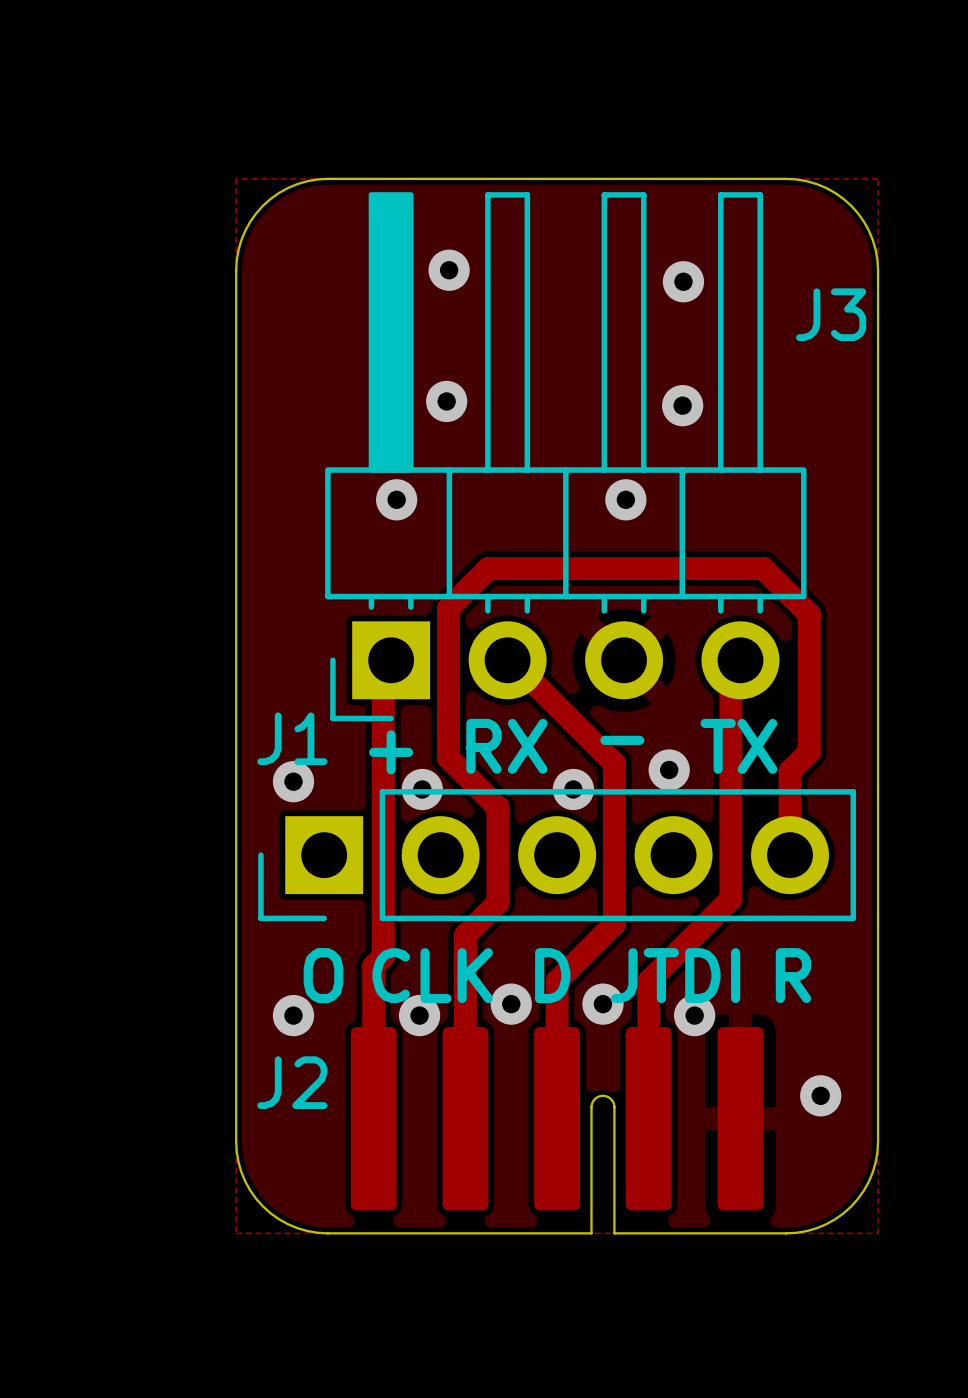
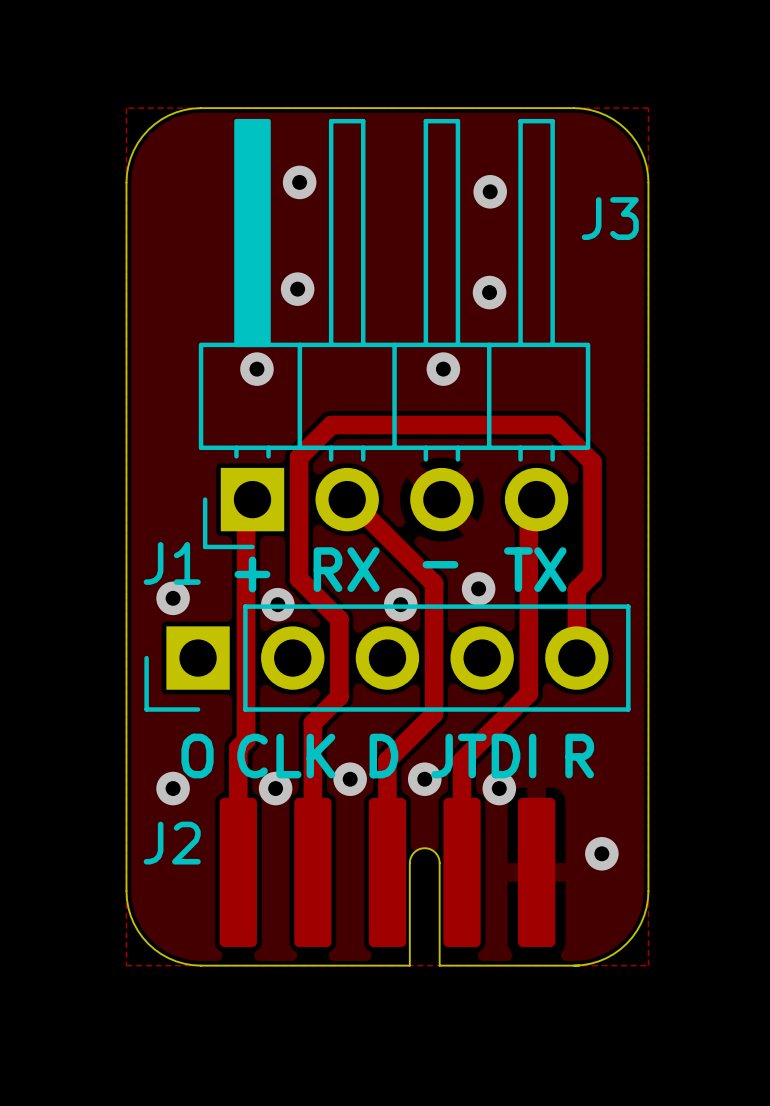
J2 footprint: [326, 1027, 788, 1235] -> [200, 797, 581, 967]

